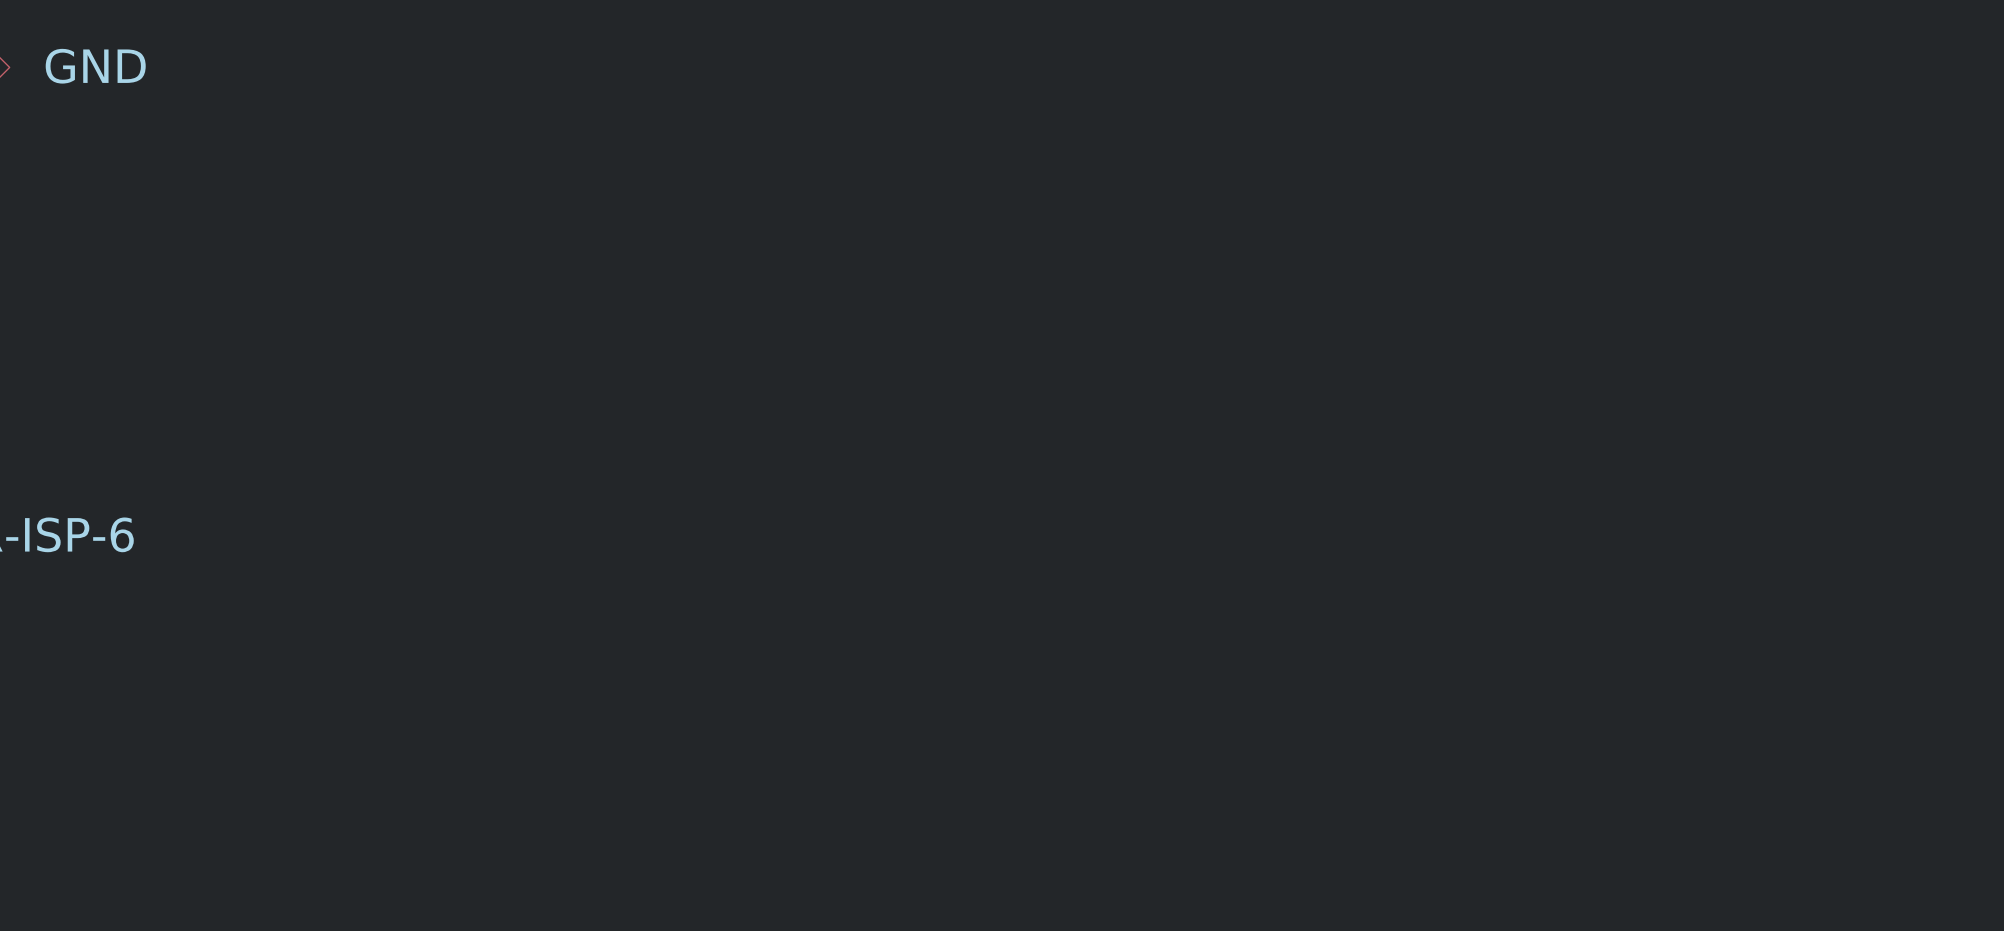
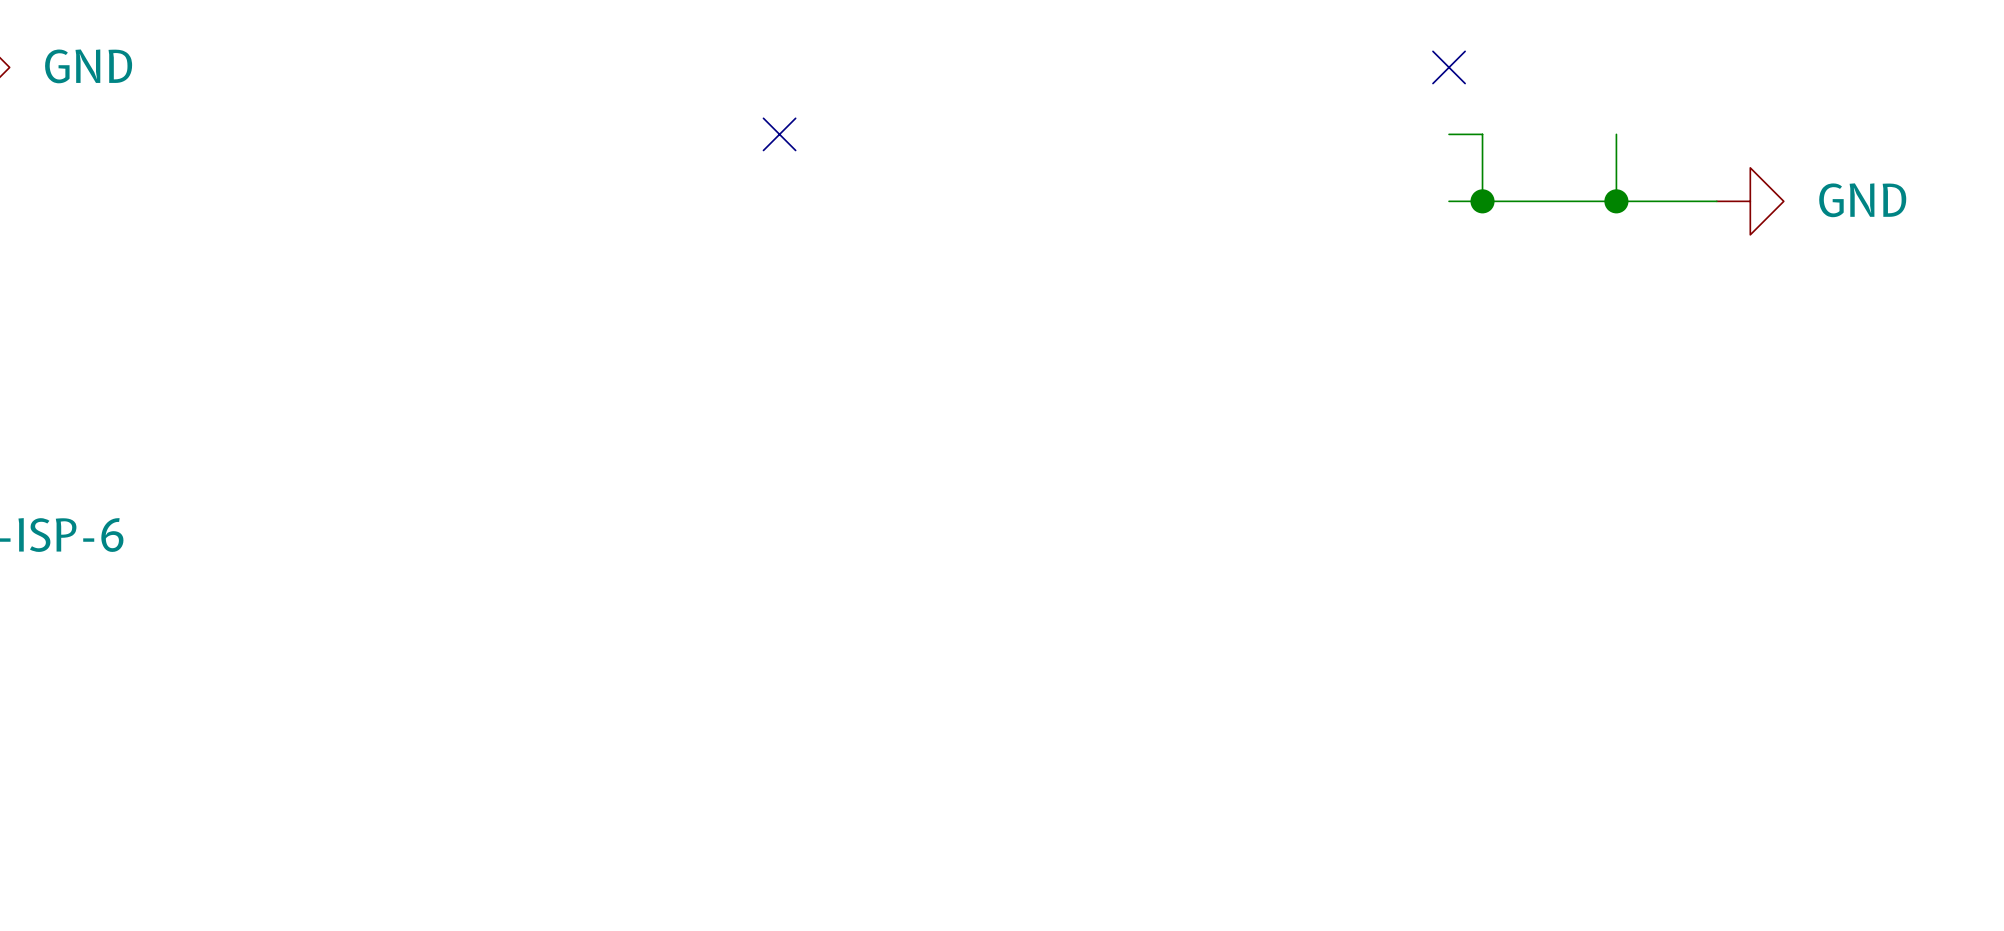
no-connect mark: none -> (1449, 67)
no-connect mark: none -> (779, 134)
wire: none -> (1449, 134) (1482, 134) (1482, 201)
wire: none -> (1616, 134) (1616, 201)
wire: none -> (1449, 201) (1716, 201)
junction: none -> (1482, 201)
junction: none -> (1616, 201)
power symbol: none -> GND (1750, 201)

